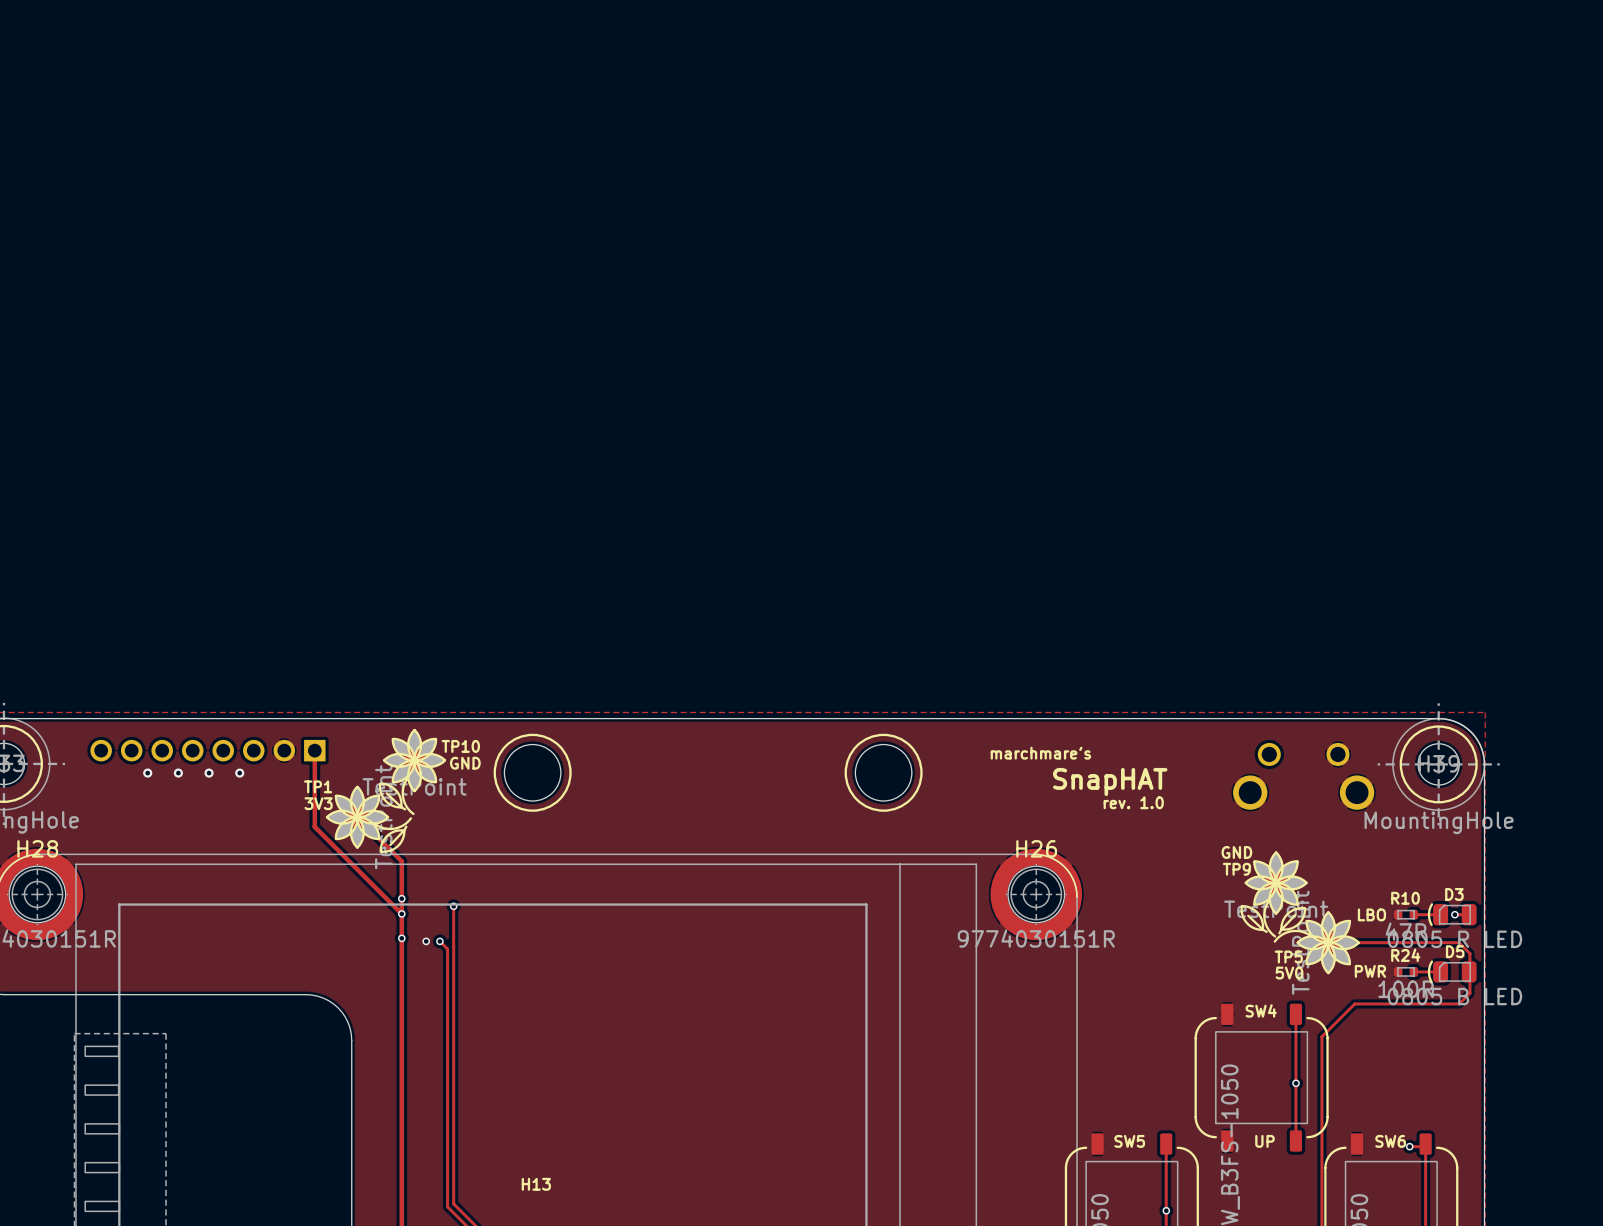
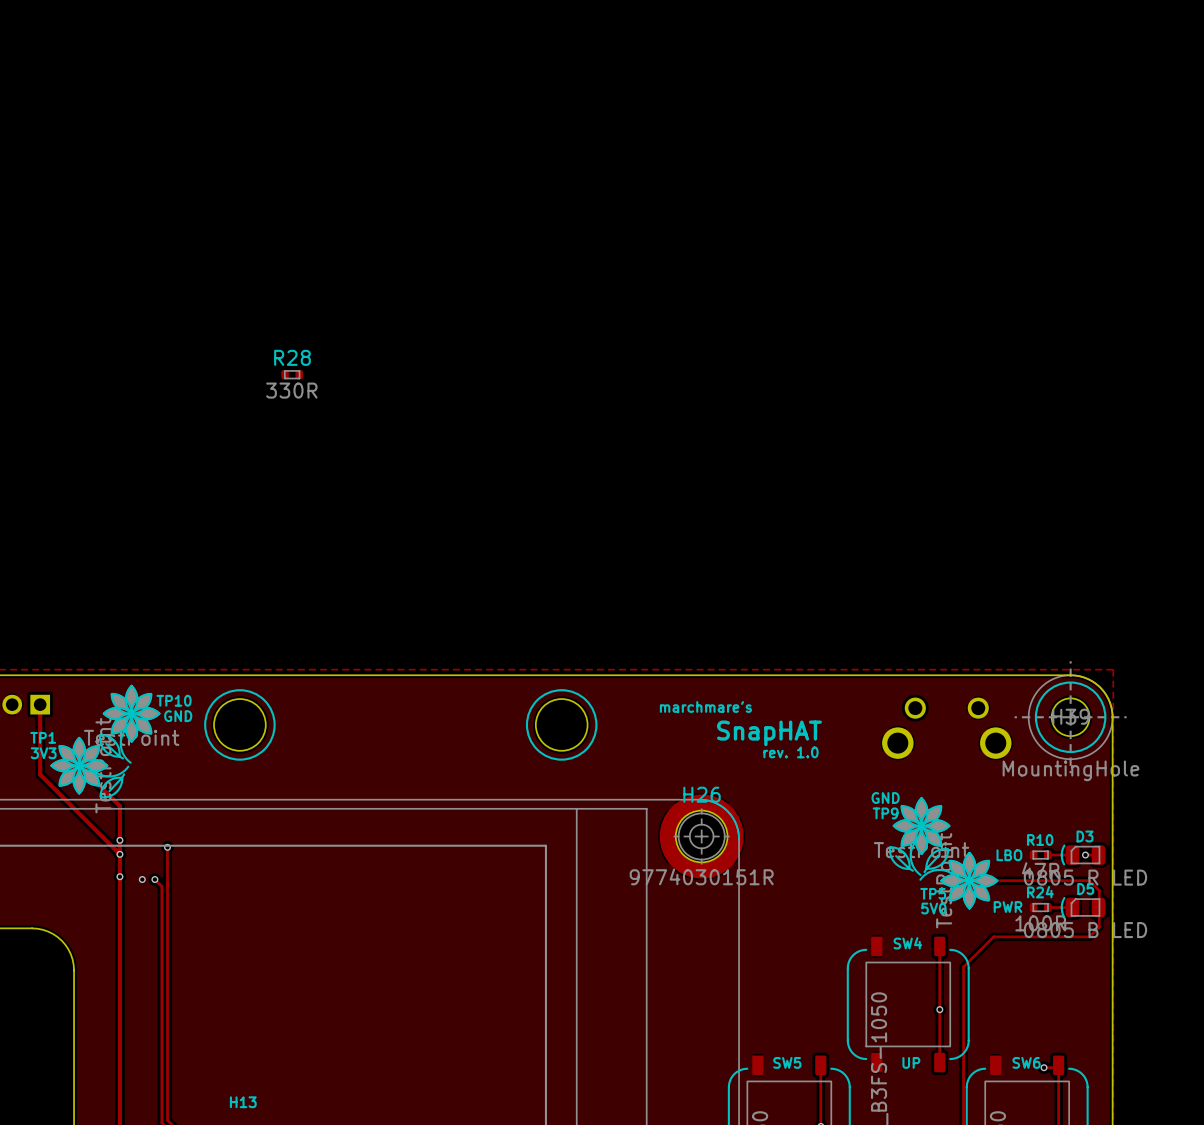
R28: none -> 330R (292, 374)

